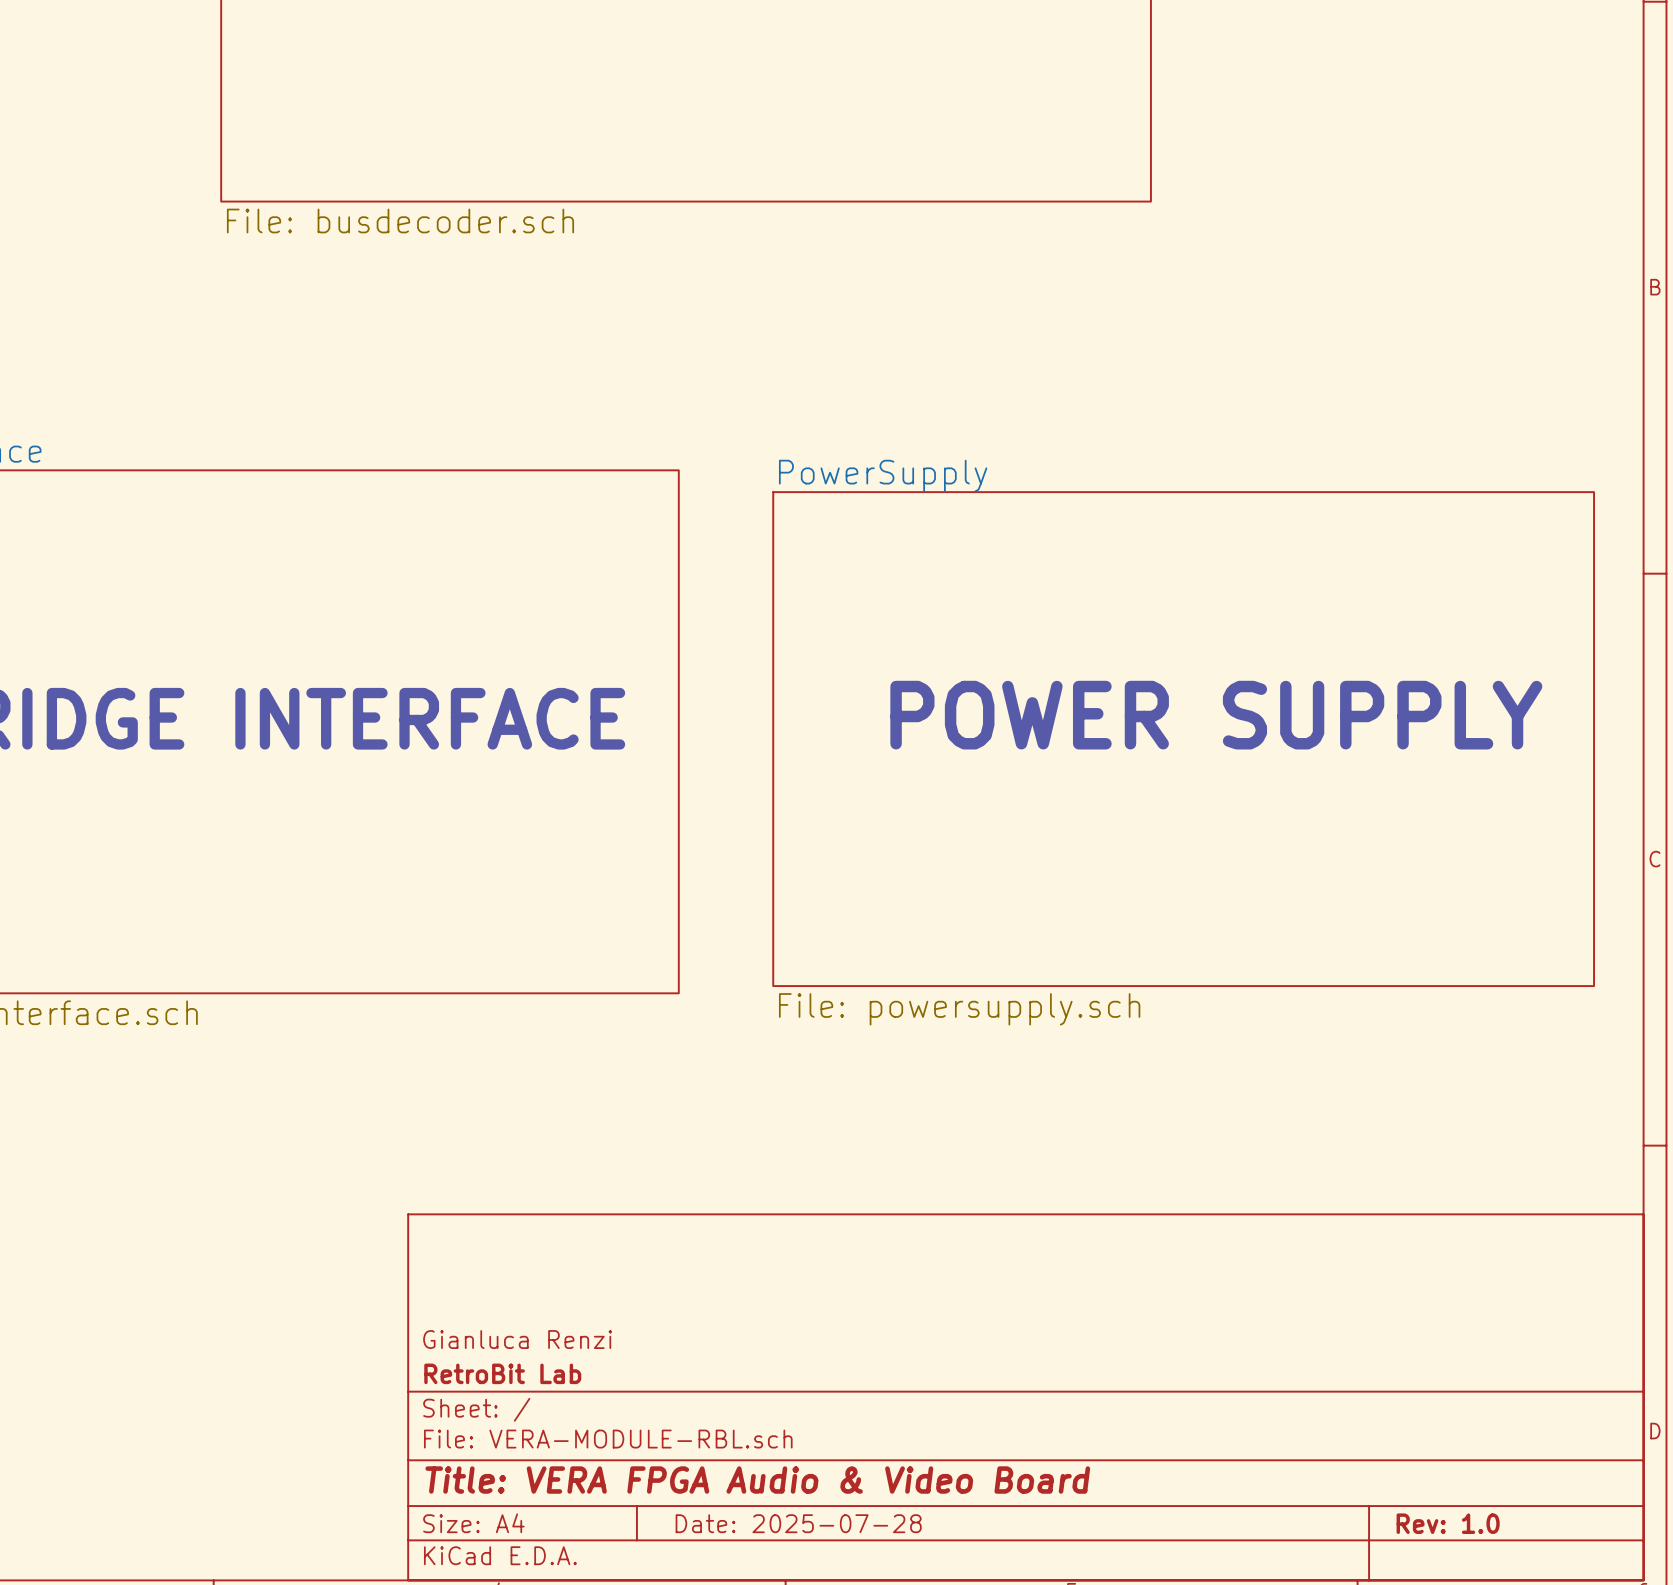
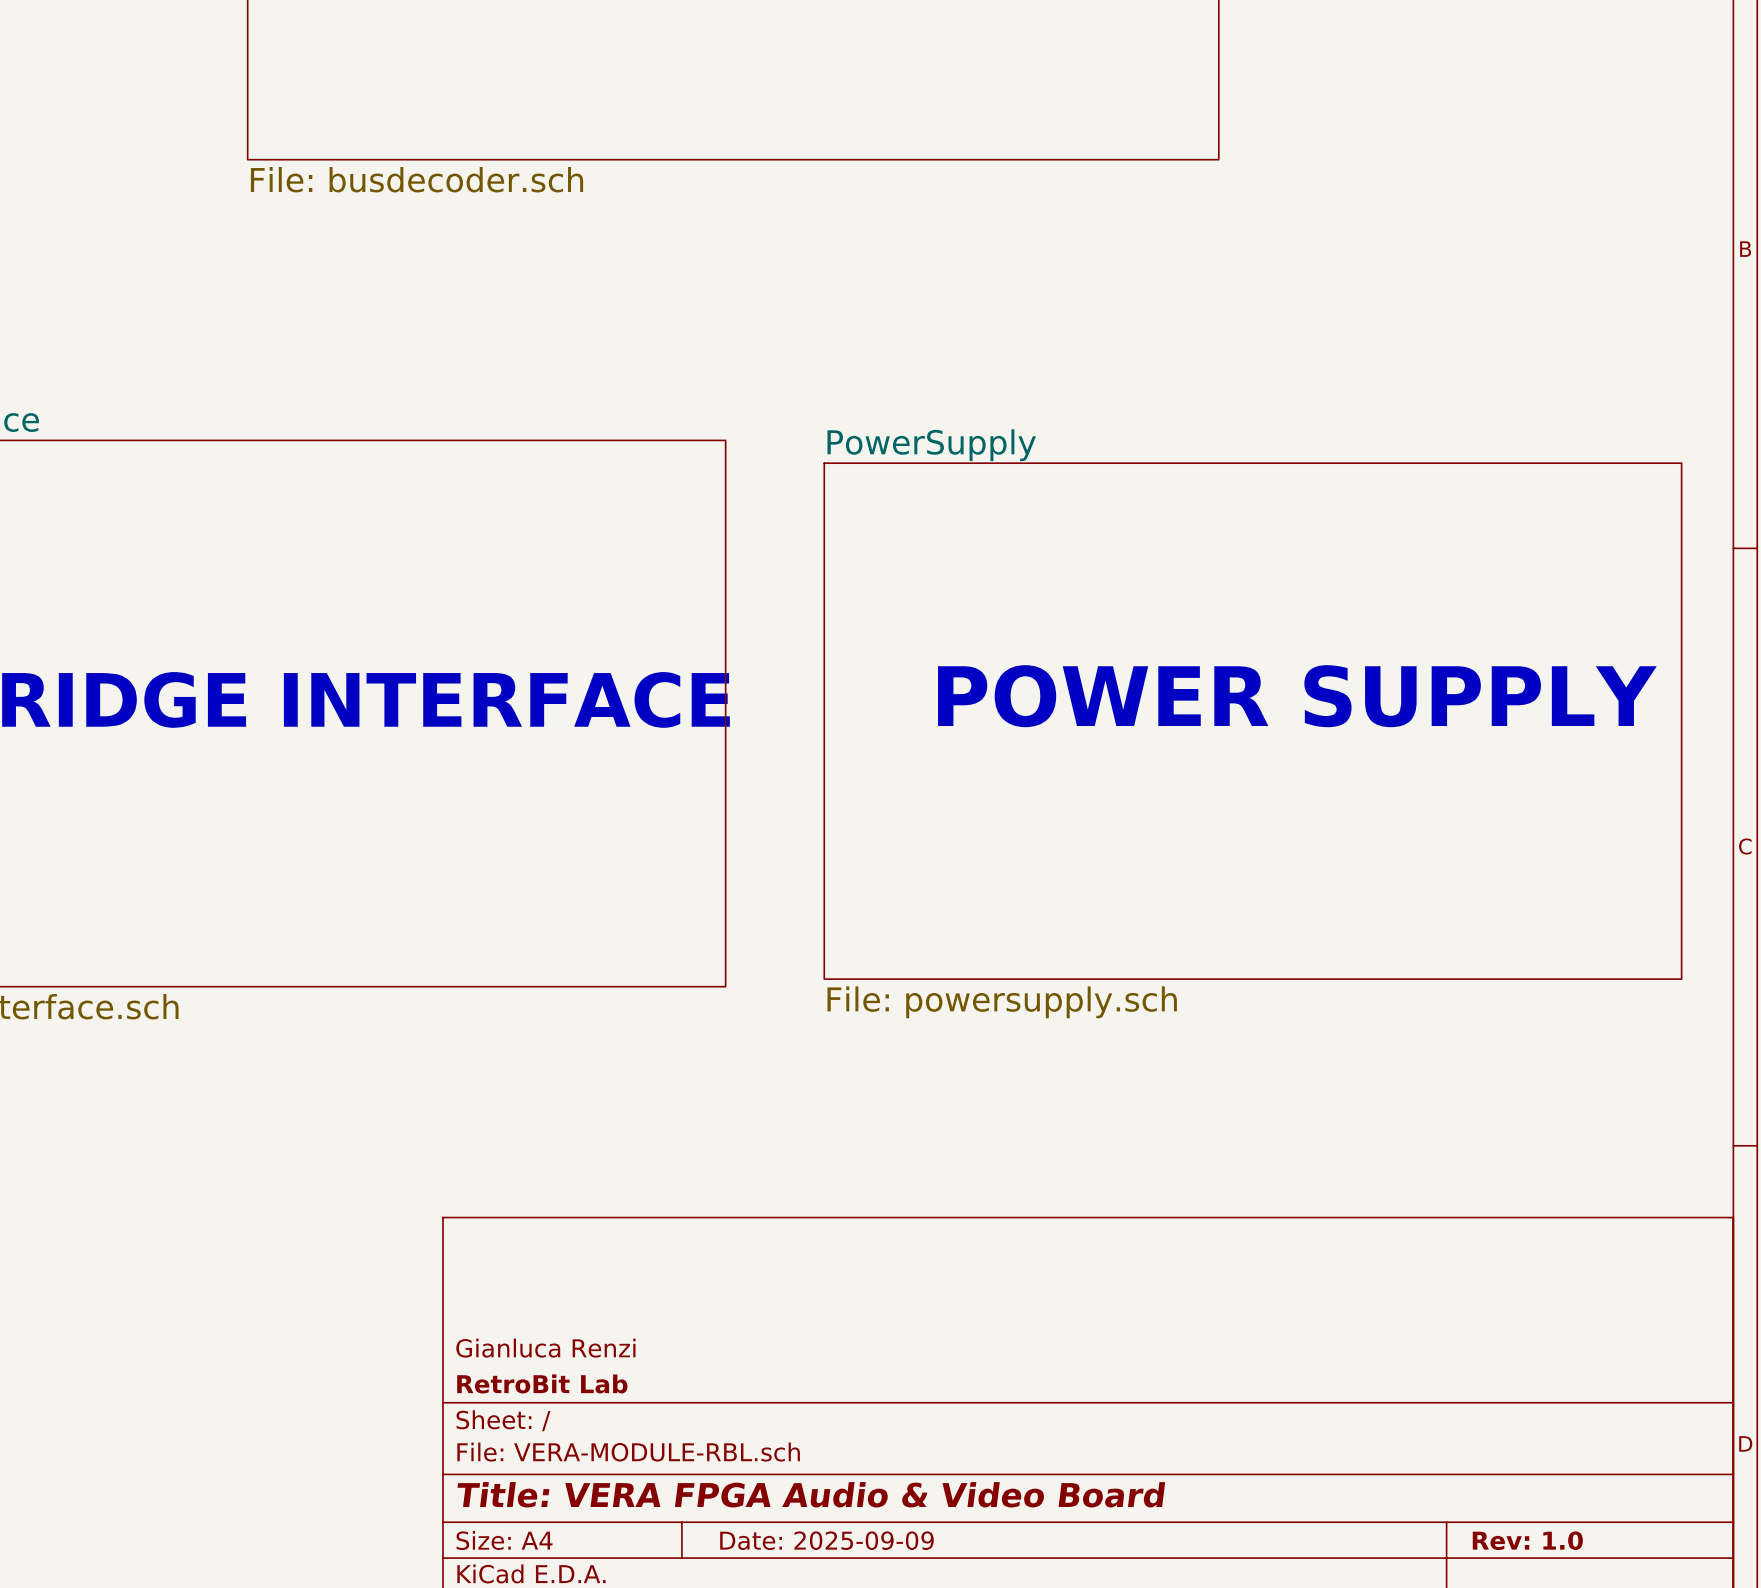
title block: Date: 2025-07-28 (798, 1523) -> Date: 2025-09-09 (826, 1540)

